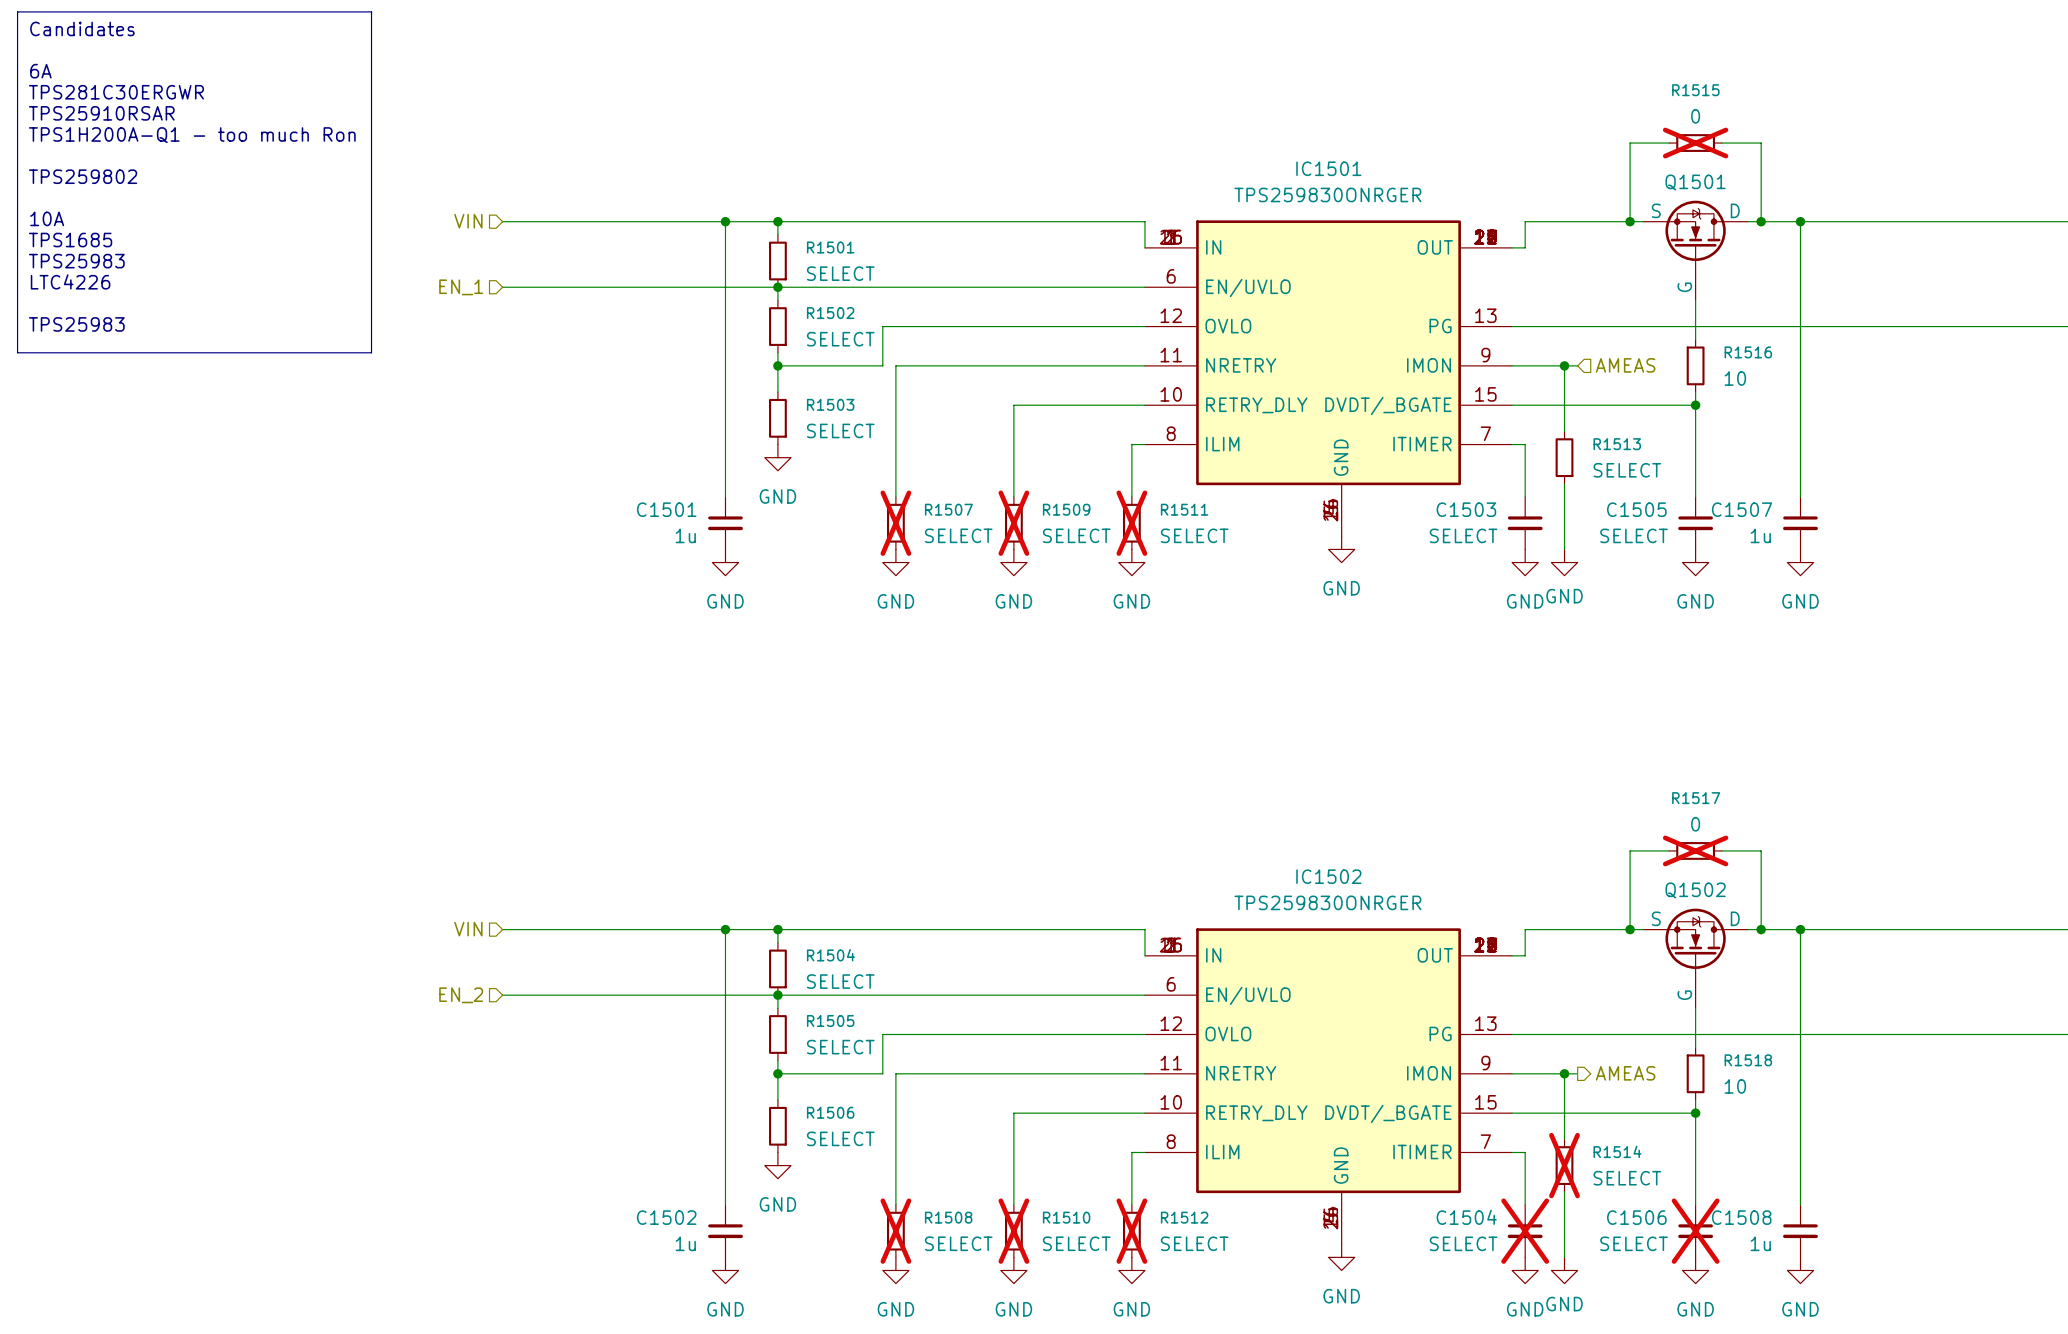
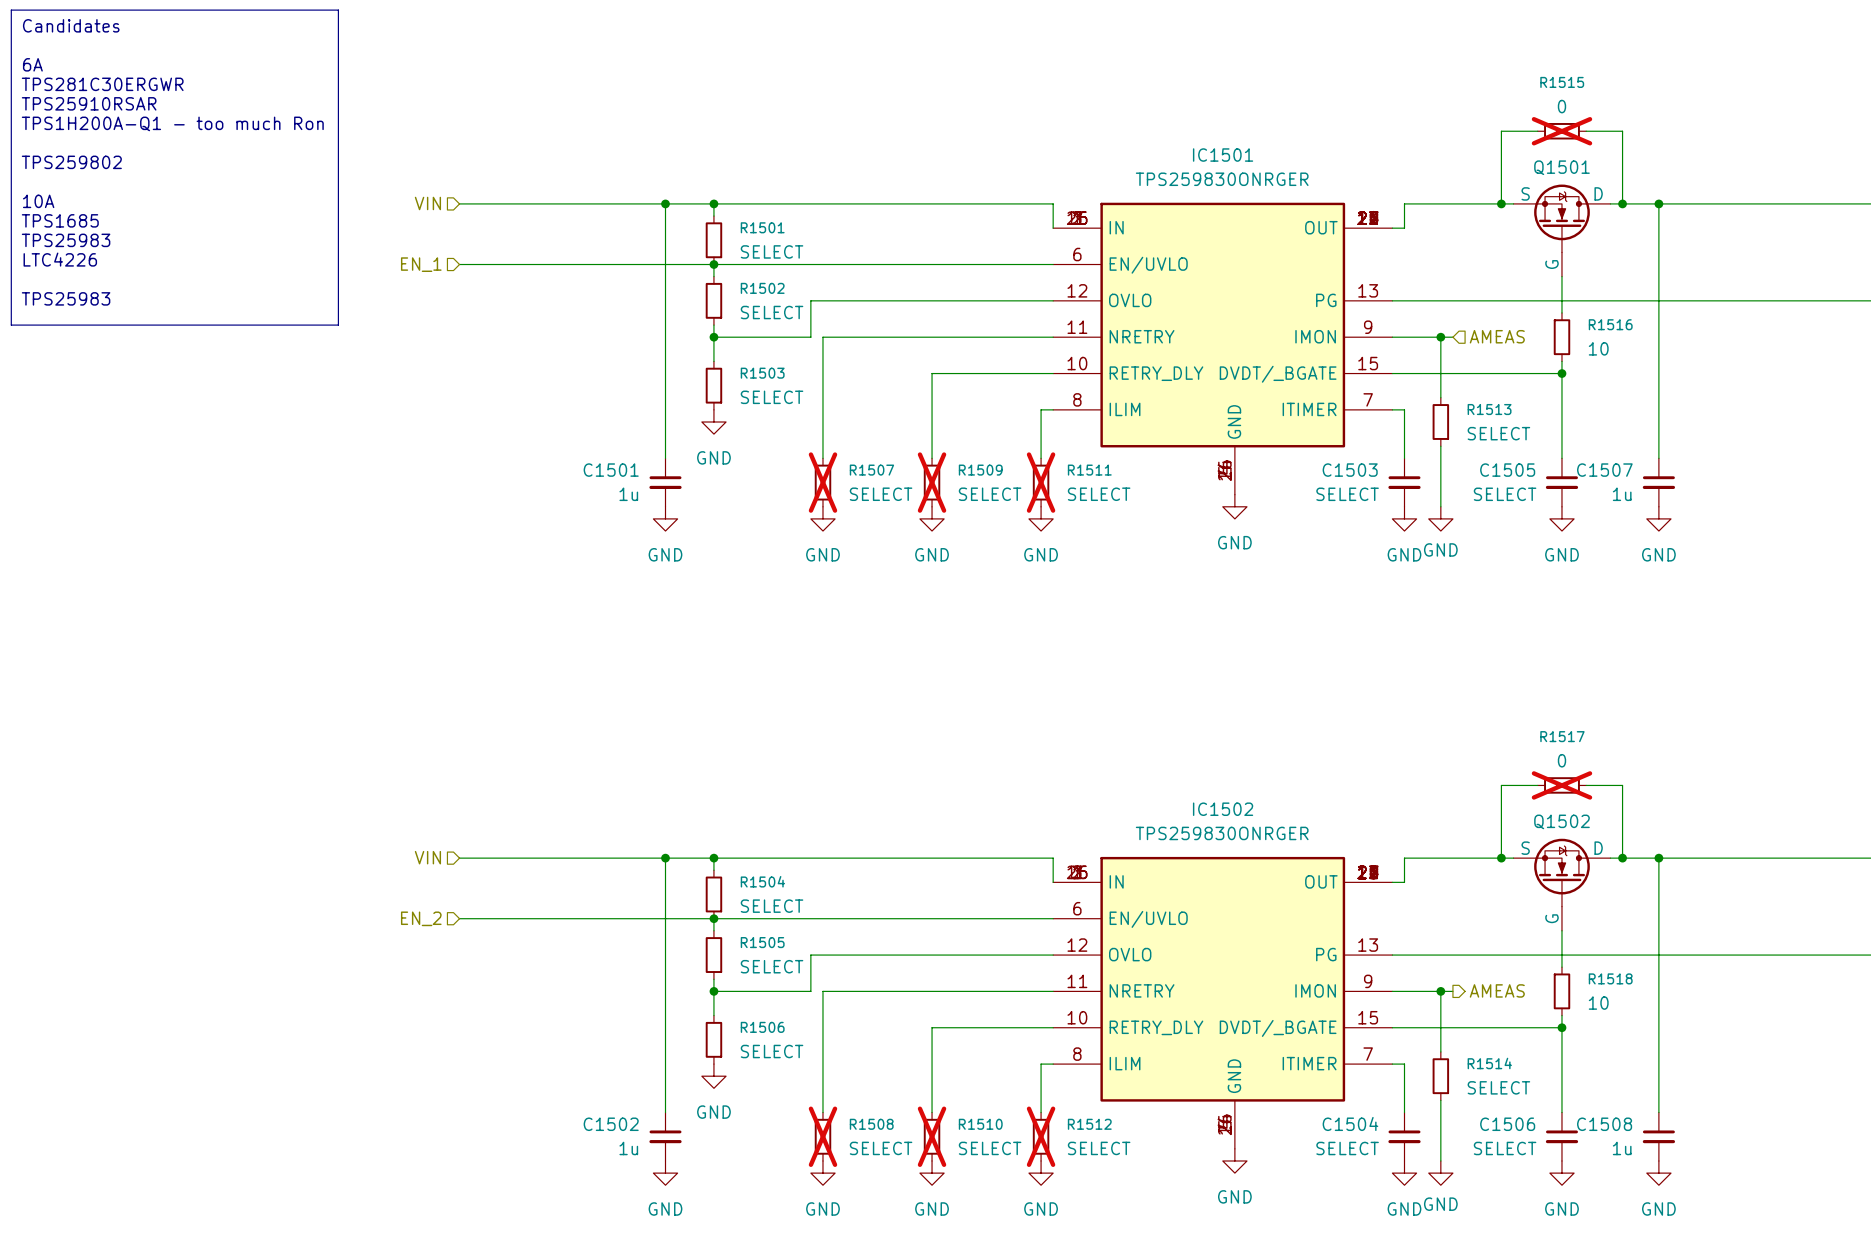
R1514 do-not-place cross: (1564, 1165) -> none
C1504 do-not-place cross: (1525, 1231) -> none
C1506 do-not-place cross: (1695, 1231) -> none

